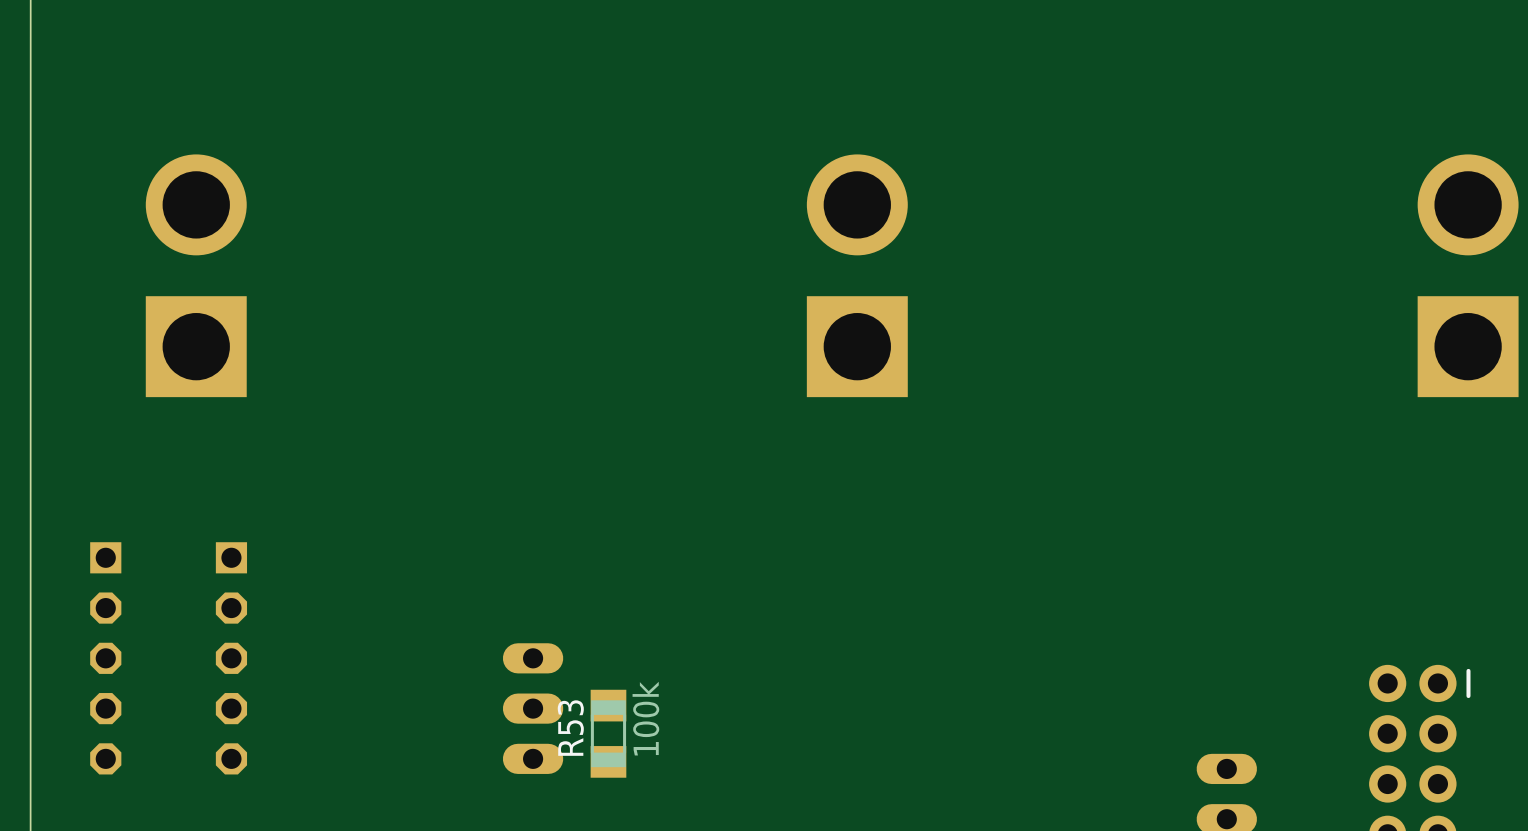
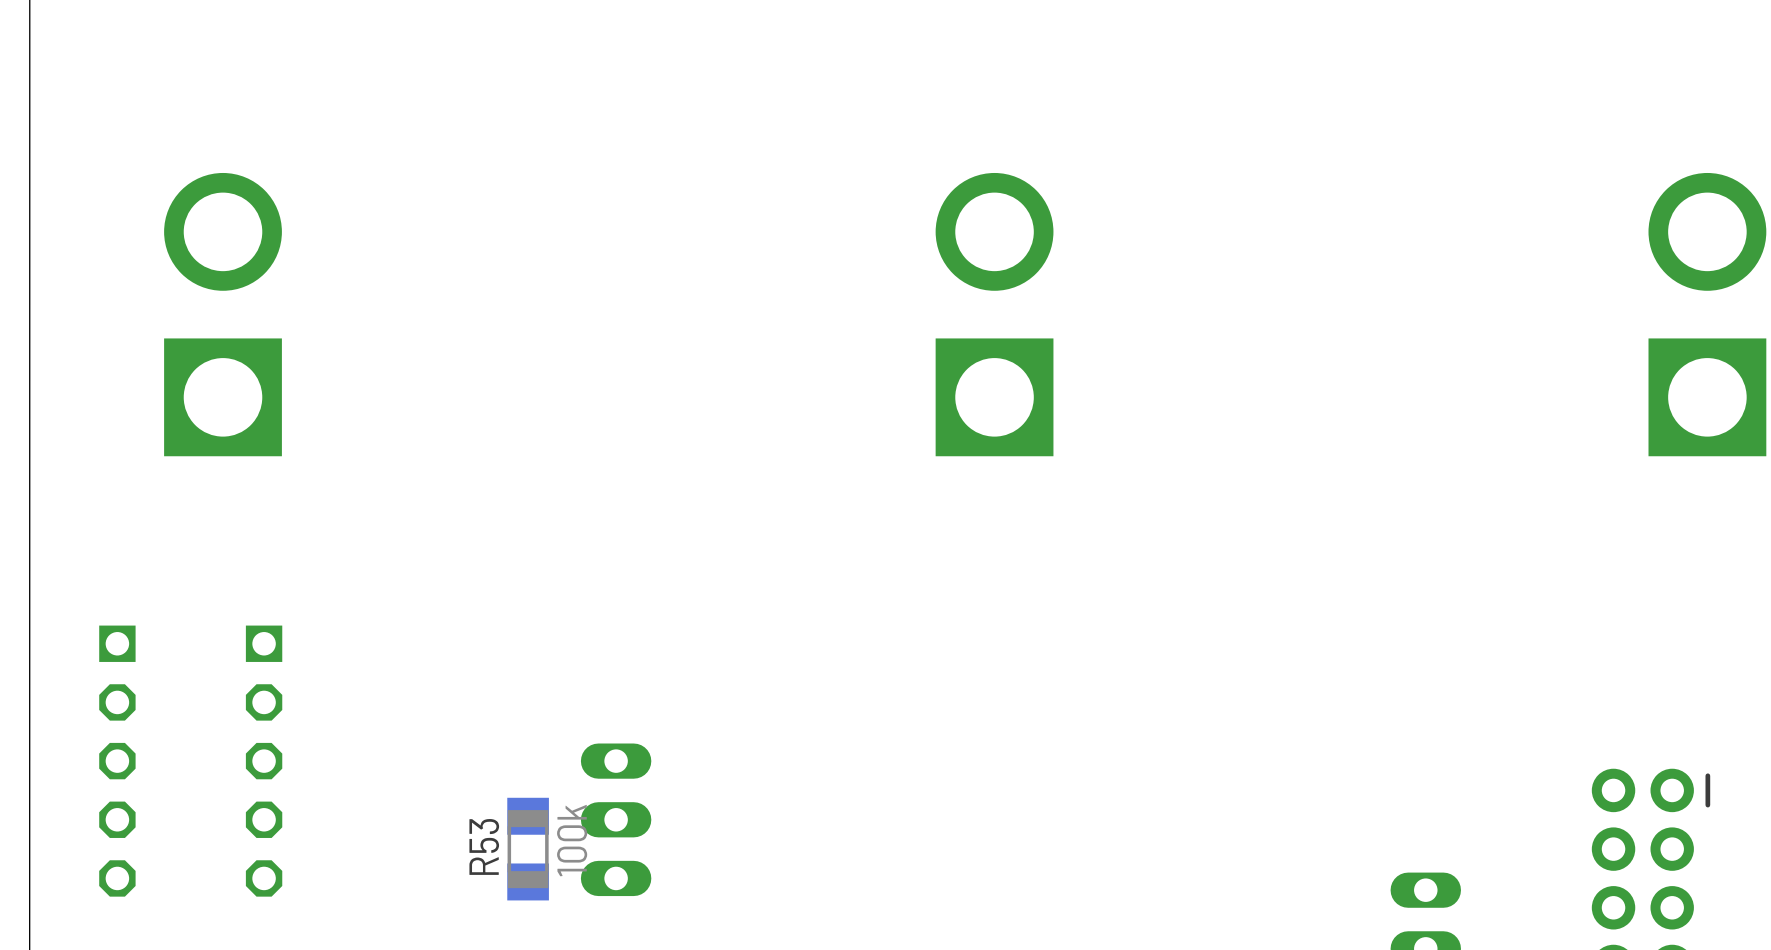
R53 position: (608, 733) -> (528, 849)

